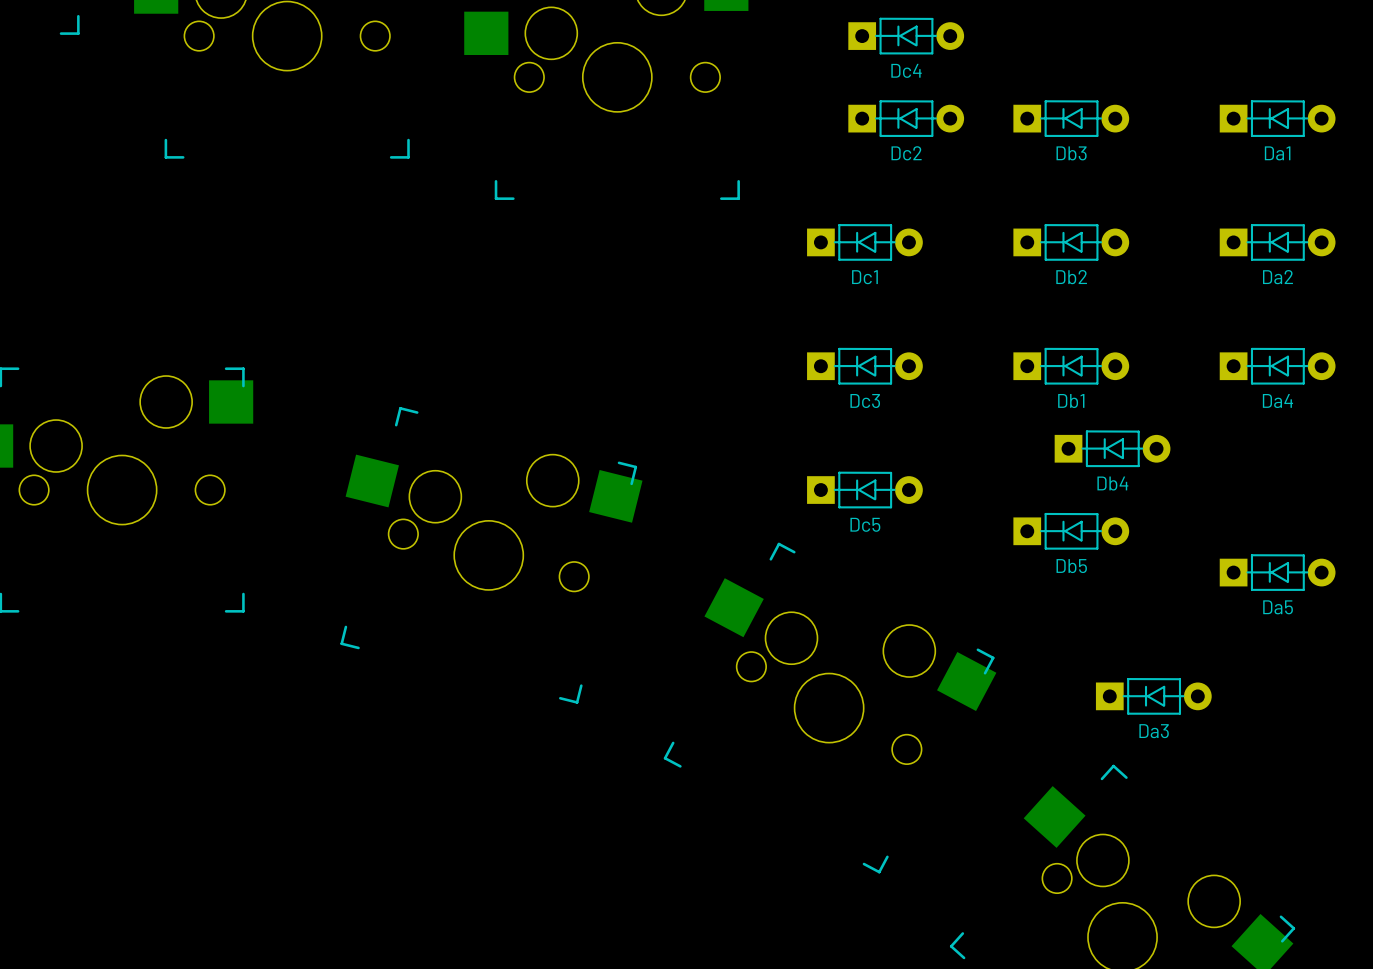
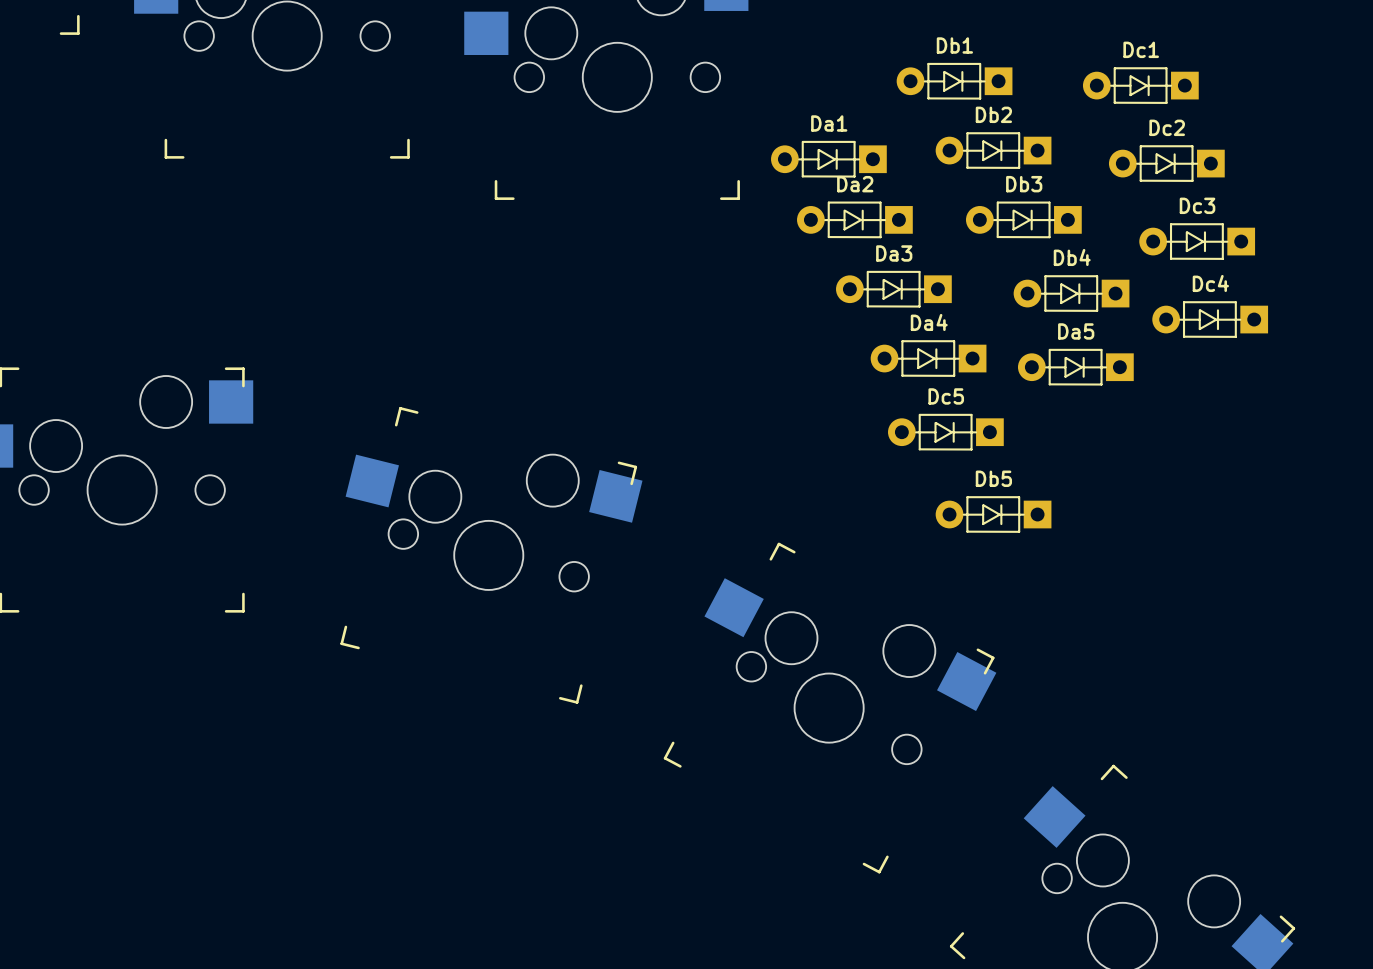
Dc4 rotation: 0° (906, 36) -> 180° (1210, 319)
Dc4 position: (906, 36) -> (1210, 319)
Dc2 rotation: 0° (906, 118) -> 180° (1166, 163)
Dc2 position: (906, 118) -> (1166, 163)
Db3 rotation: 0° (1071, 118) -> 180° (1023, 219)
Db3 position: (1071, 118) -> (1023, 219)
Da1 rotation: 0° (1277, 118) -> 180° (828, 159)
Da1 position: (1277, 118) -> (828, 159)
Dc1 rotation: 0° (864, 242) -> 180° (1140, 85)
Dc1 position: (864, 242) -> (1140, 85)
Db2 rotation: 0° (1071, 242) -> 180° (993, 150)
Db2 position: (1071, 242) -> (993, 150)
Da2 rotation: 0° (1277, 242) -> 180° (854, 219)
Da2 position: (1277, 242) -> (854, 219)
Dc3 rotation: 0° (864, 366) -> 180° (1197, 241)
Dc3 position: (864, 366) -> (1197, 241)
Db1 rotation: 0° (1071, 366) -> 180° (954, 81)
Db1 position: (1071, 366) -> (954, 81)
Da4 rotation: 0° (1277, 366) -> 180° (928, 358)
Da4 position: (1277, 366) -> (928, 358)
Db4 rotation: 0° (1112, 448) -> 180° (1071, 293)
Db4 position: (1112, 448) -> (1071, 293)
Dc5 rotation: 0° (864, 490) -> 180° (945, 432)
Dc5 position: (864, 490) -> (945, 432)
Db5 rotation: 0° (1071, 531) -> 180° (993, 514)
Db5 position: (1071, 531) -> (993, 514)
Da5 rotation: 0° (1277, 572) -> 180° (1075, 367)
Da5 position: (1277, 572) -> (1075, 367)
Da3 rotation: 0° (1153, 696) -> 180° (893, 289)
Da3 position: (1153, 696) -> (893, 289)

